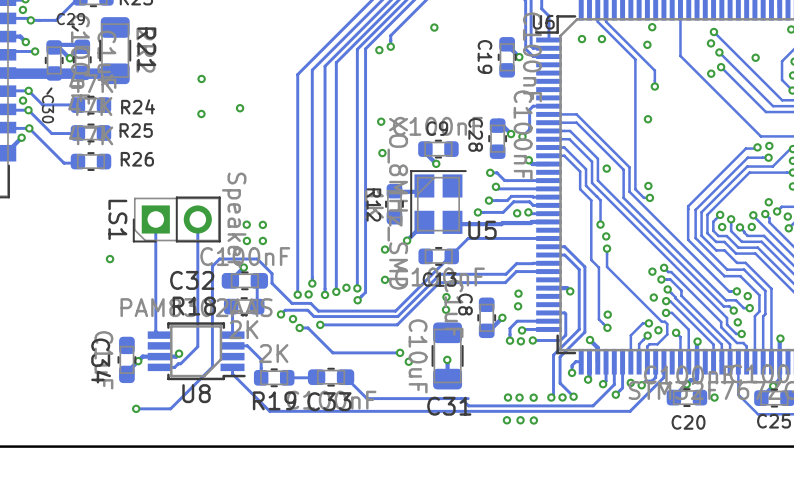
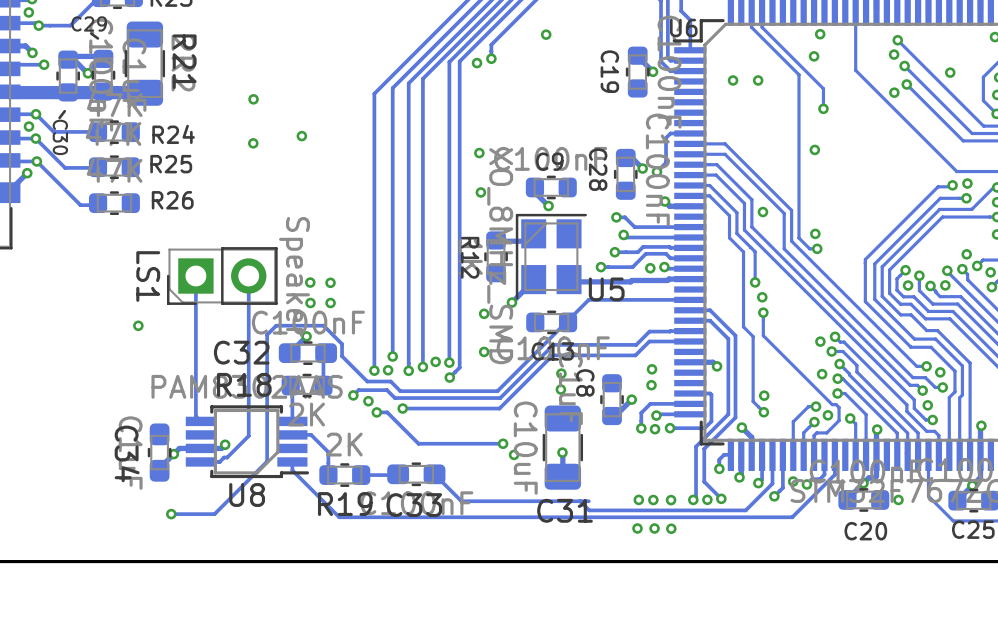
via: (581, 39) -> none
via: (601, 39) -> none
via: none -> (733, 80)
via: none -> (758, 80)

